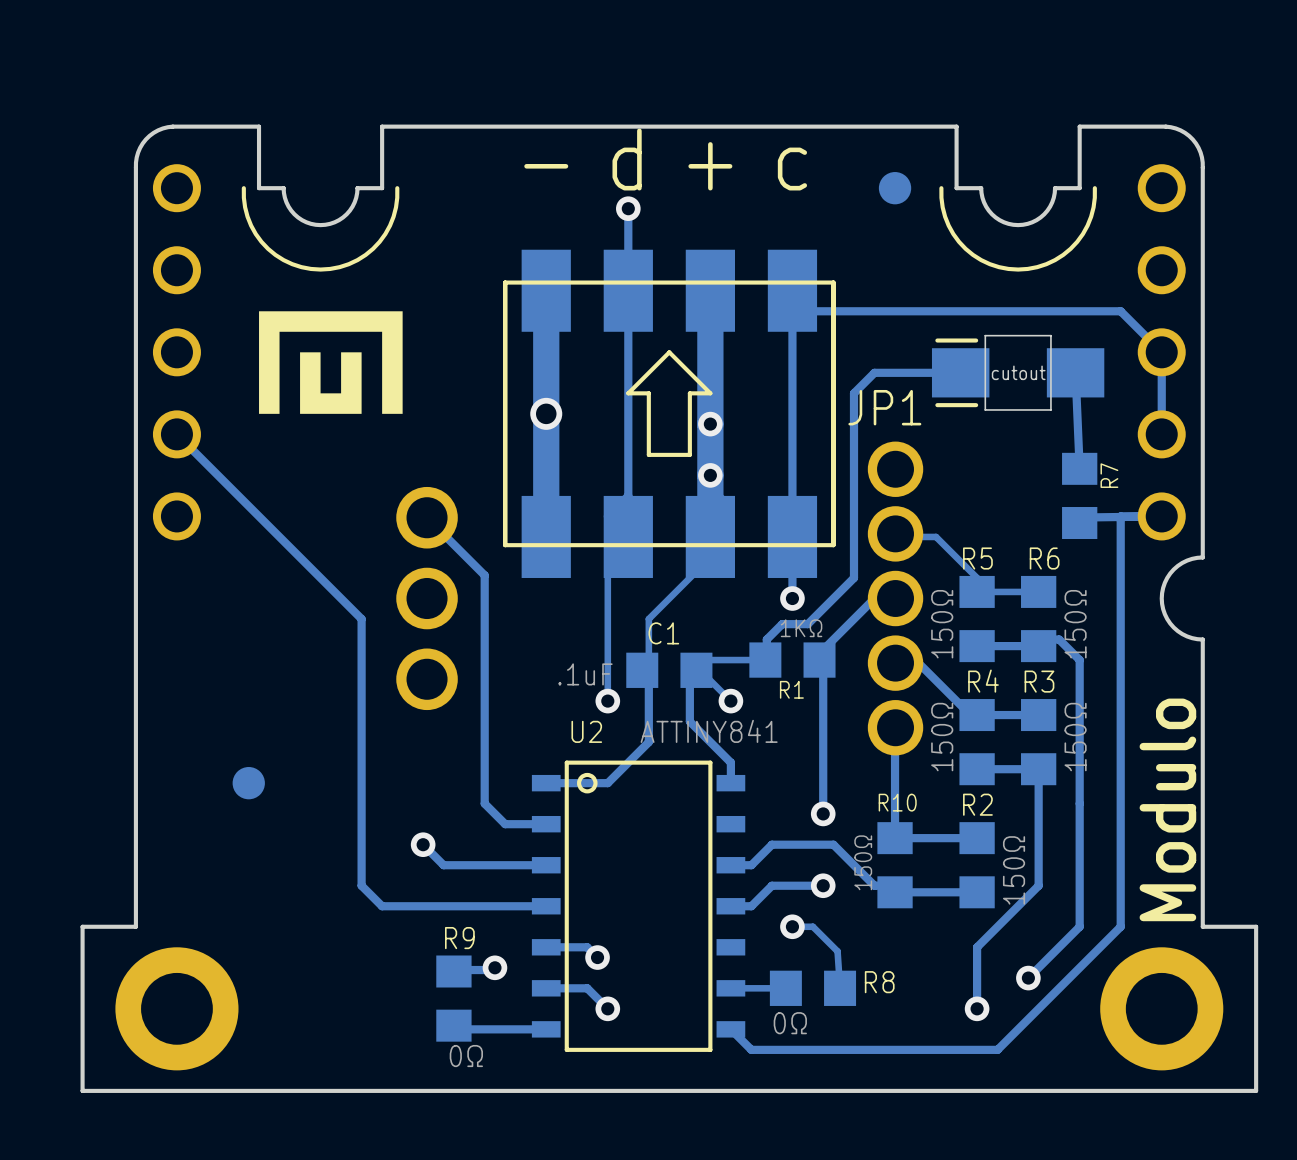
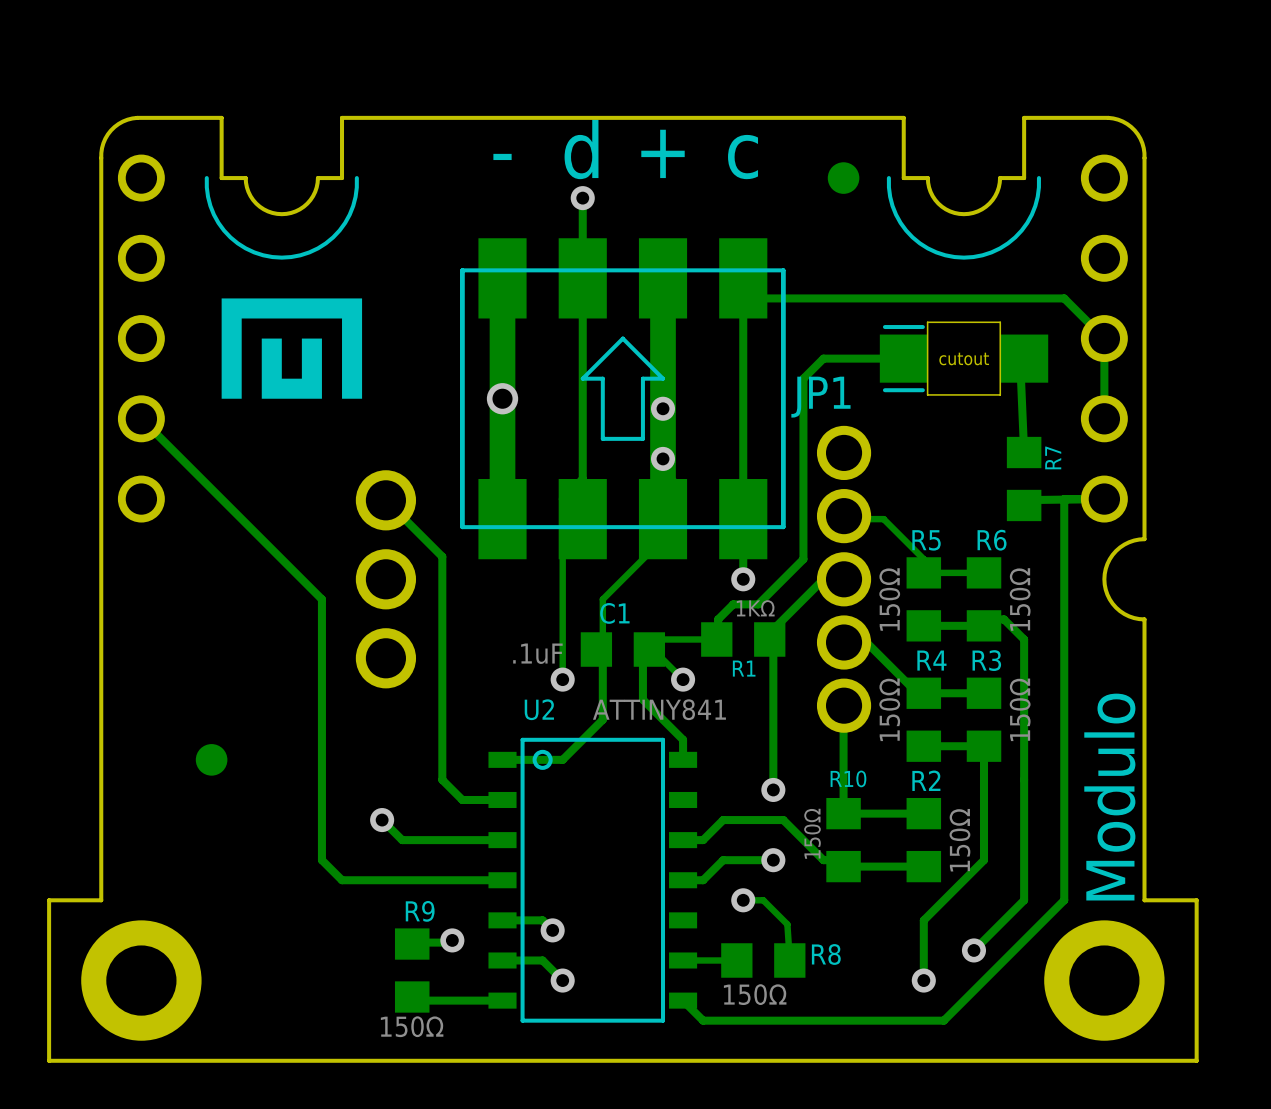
part footprint: [931, 334, 1105, 411] -> [879, 321, 1049, 396]
R8 value: 0Ω (790, 1023) -> 150Ω (755, 994)
R9 value: 0Ω (466, 1056) -> 150Ω (412, 1026)

